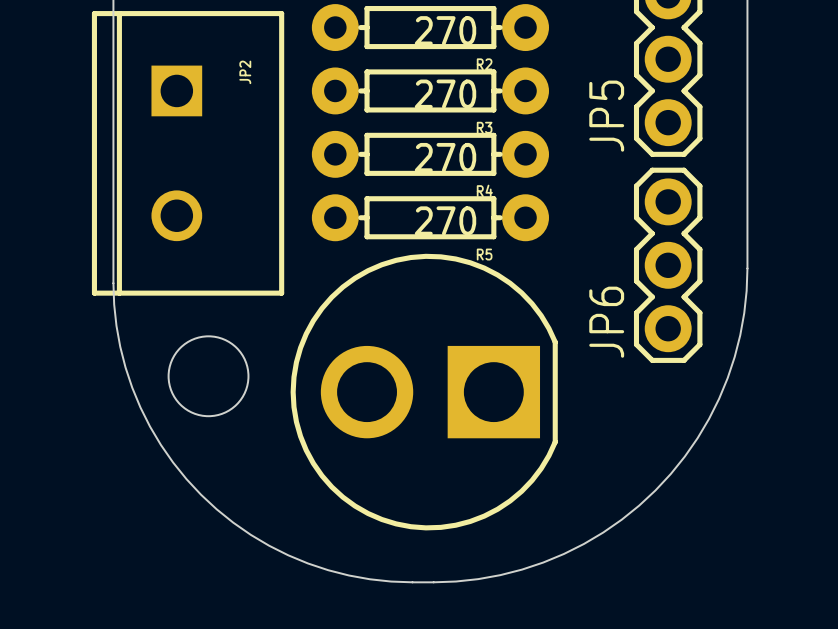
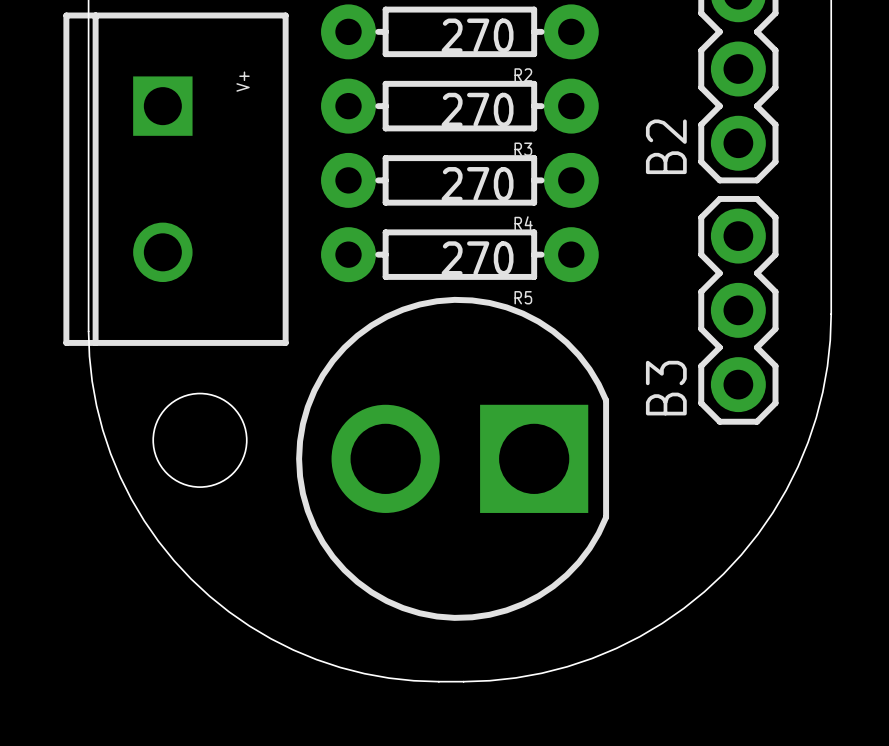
JP2 name: JP2 (245, 72) -> V+ (243, 81)
JP5 name: JP5 (606, 116) -> B2 (666, 146)
JP6 name: JP6 (606, 322) -> B3 (666, 388)

